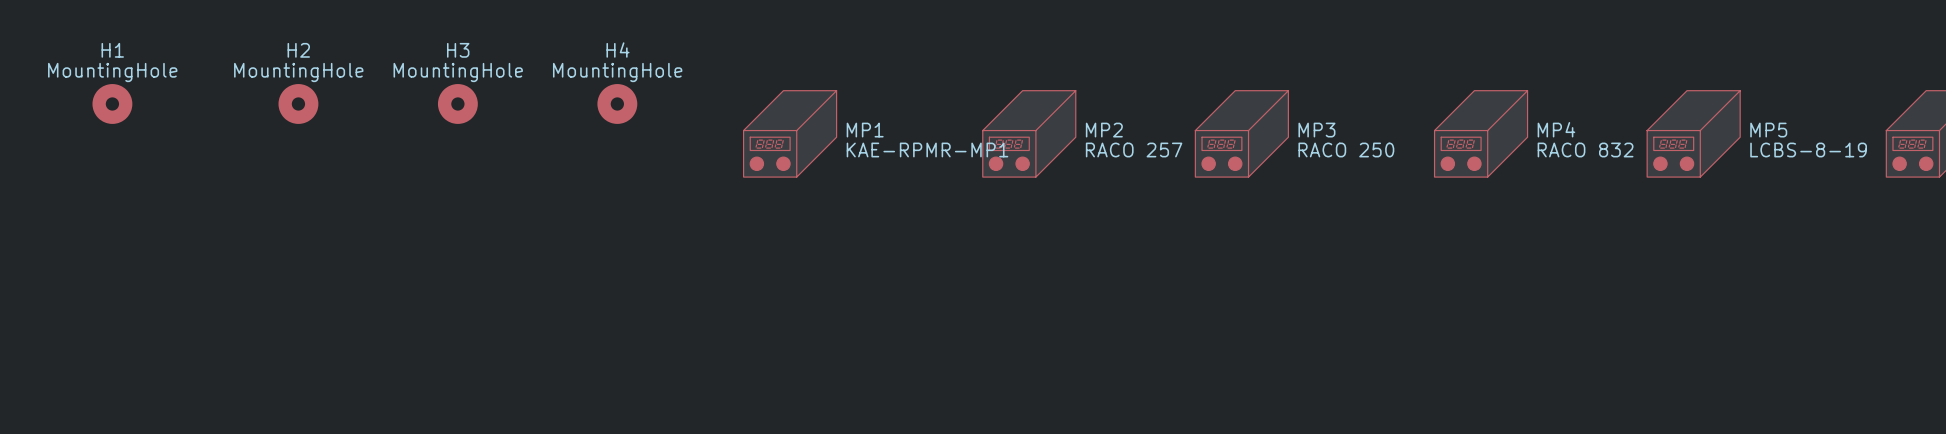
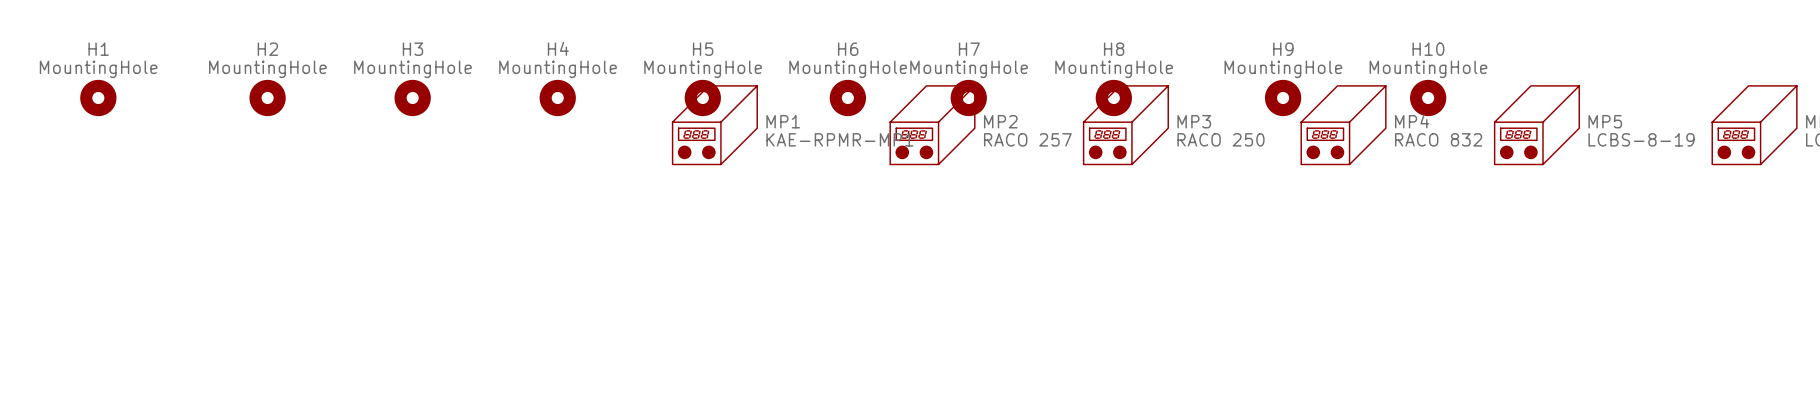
H5: none -> MountingHole (702, 97)
H6: none -> MountingHole (847, 97)
H7: none -> MountingHole (968, 97)
H8: none -> MountingHole (1113, 97)
H9: none -> MountingHole (1283, 97)
H10: none -> MountingHole (1428, 97)

